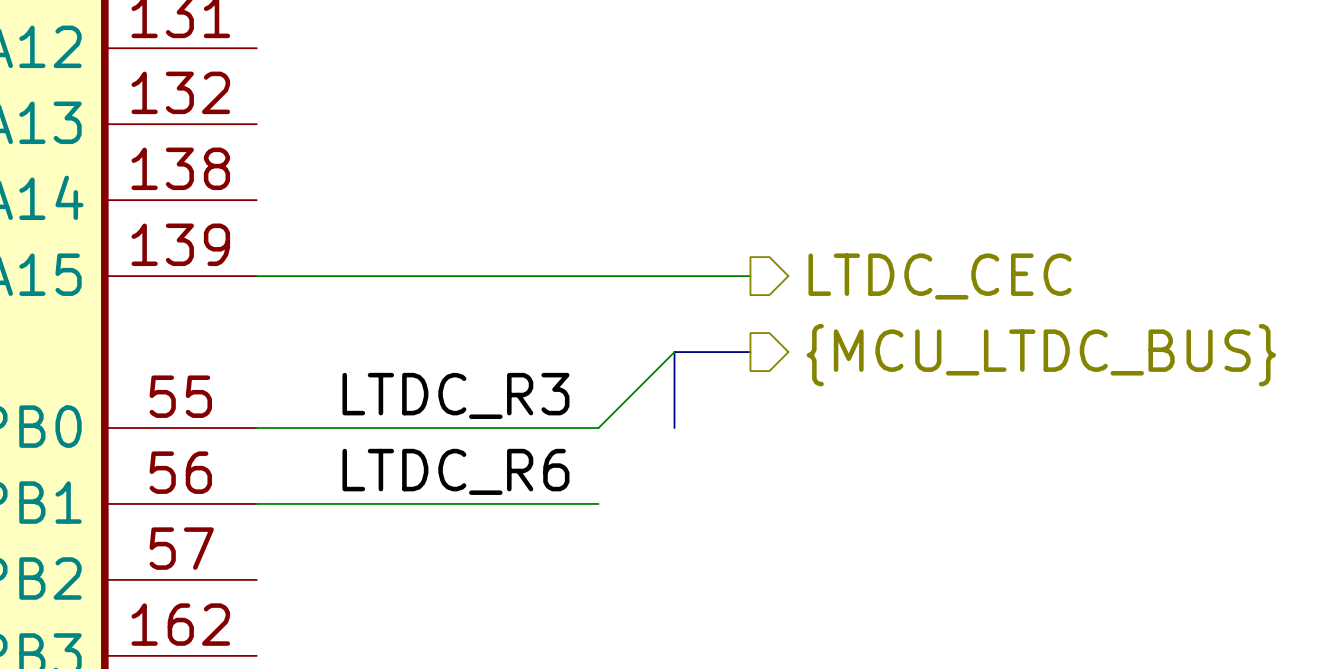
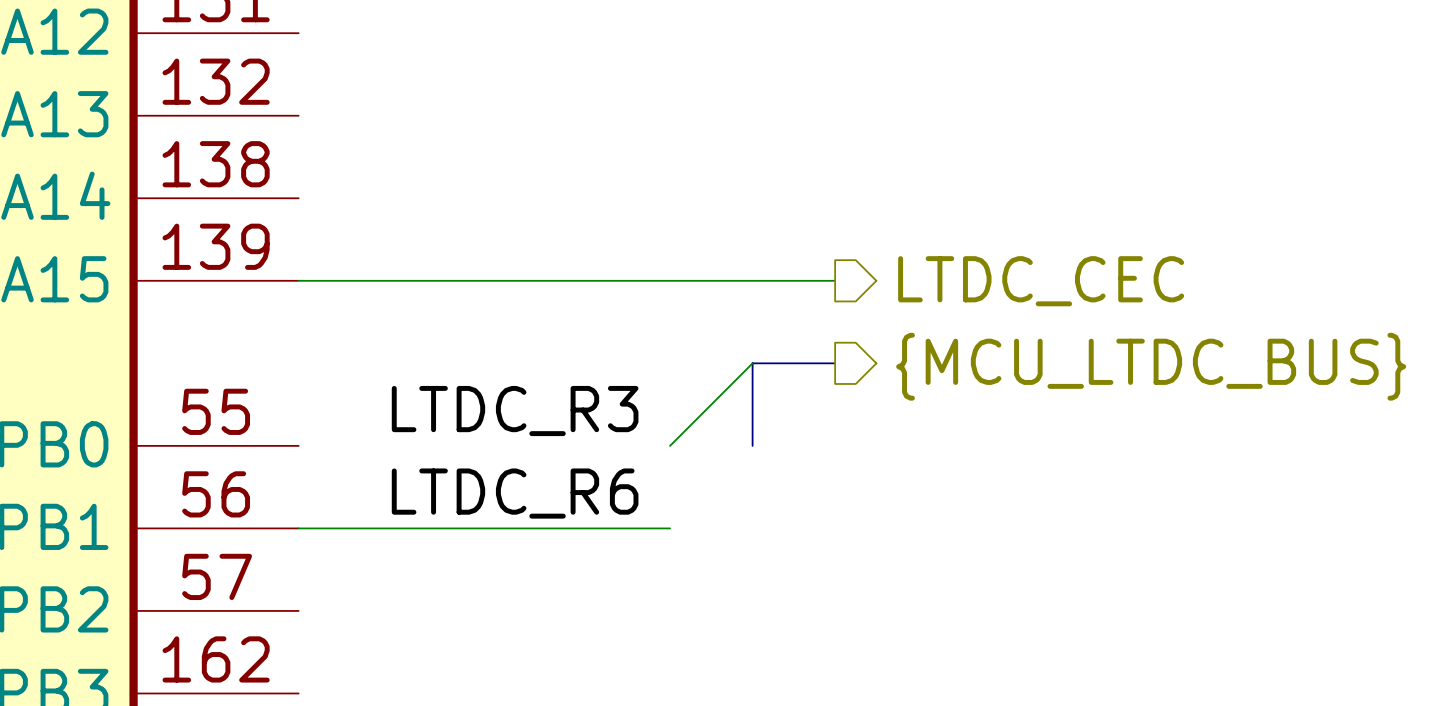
wire: (256, 428) (598, 428) -> none

